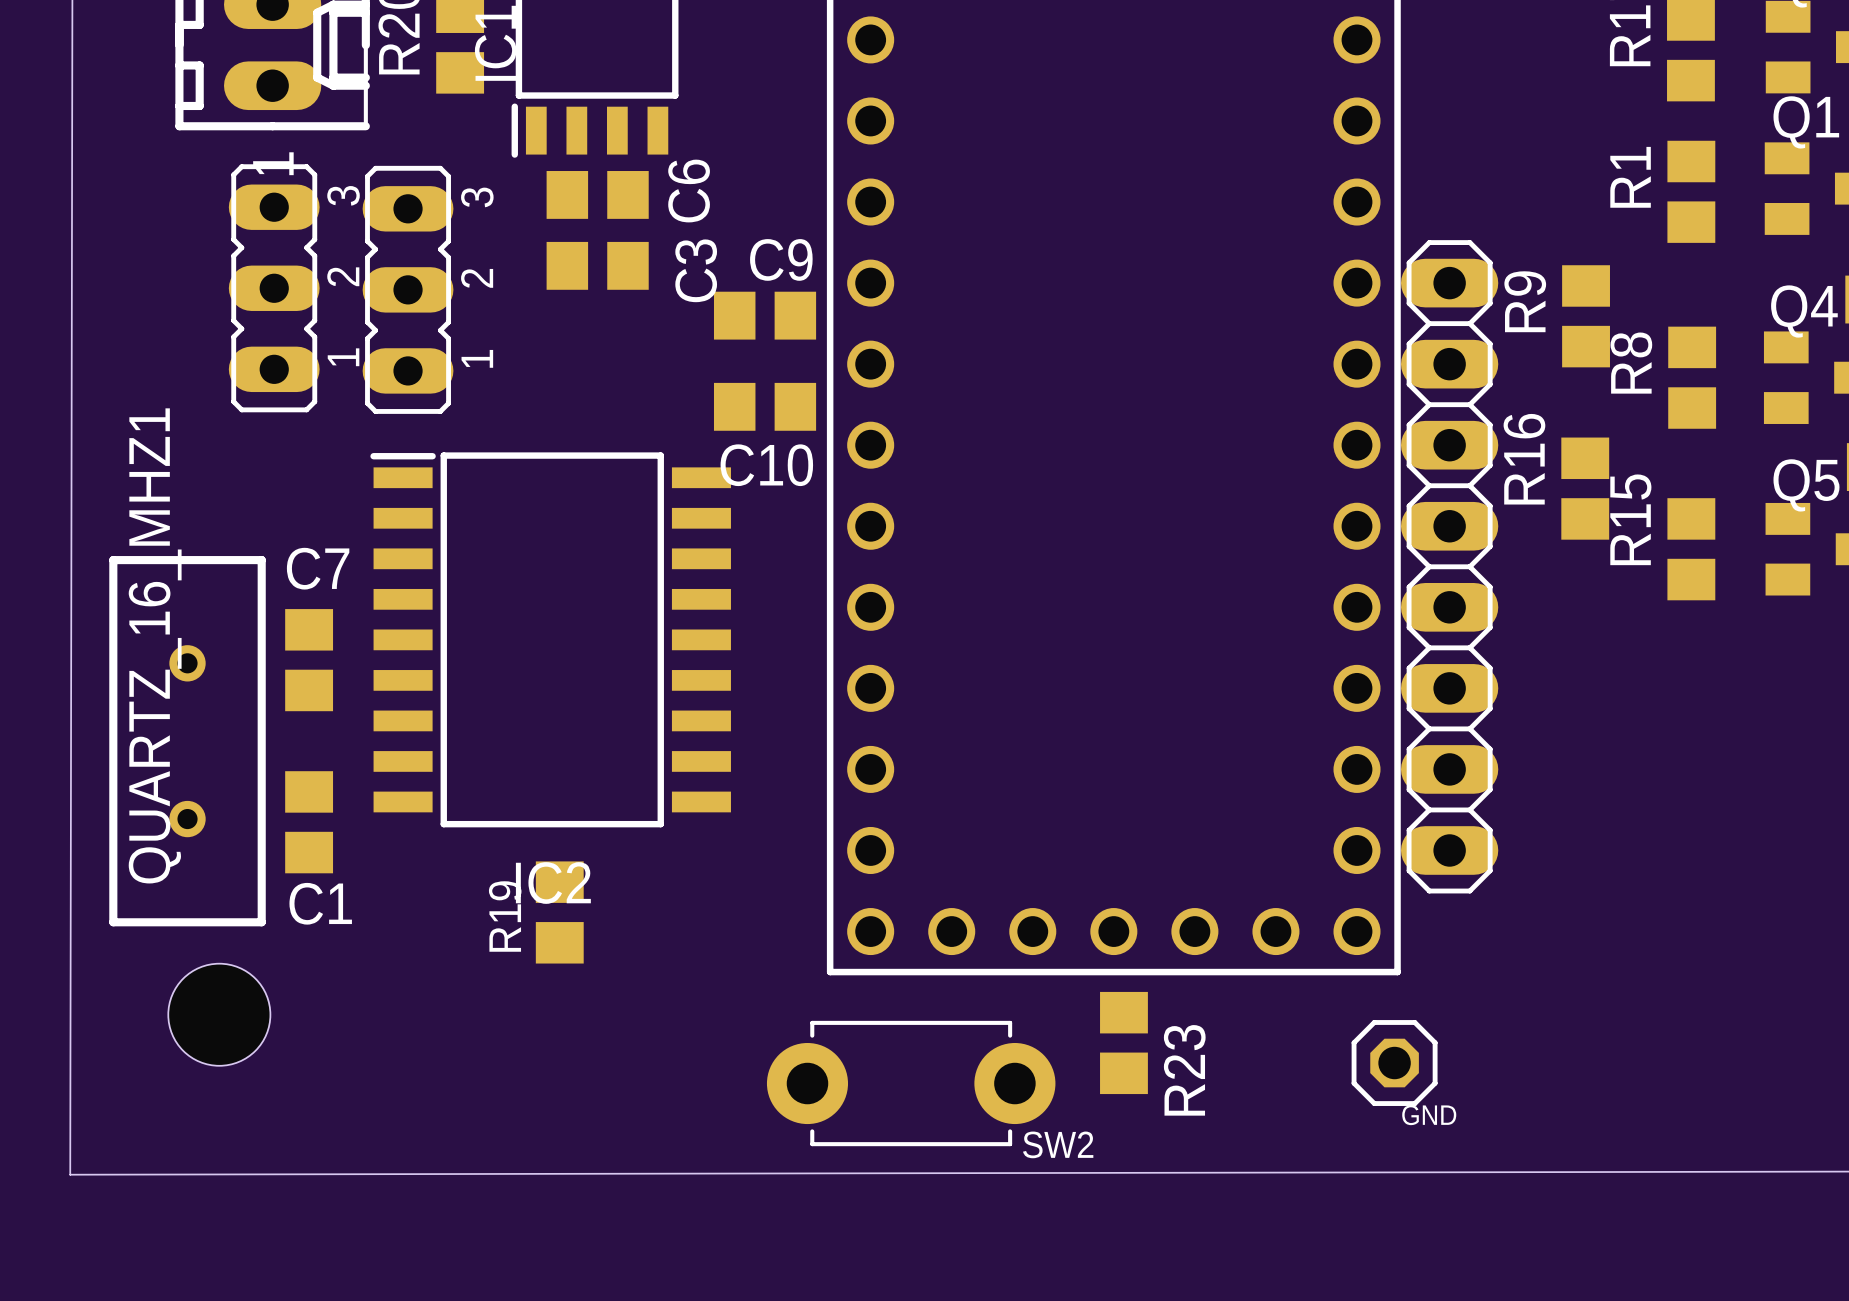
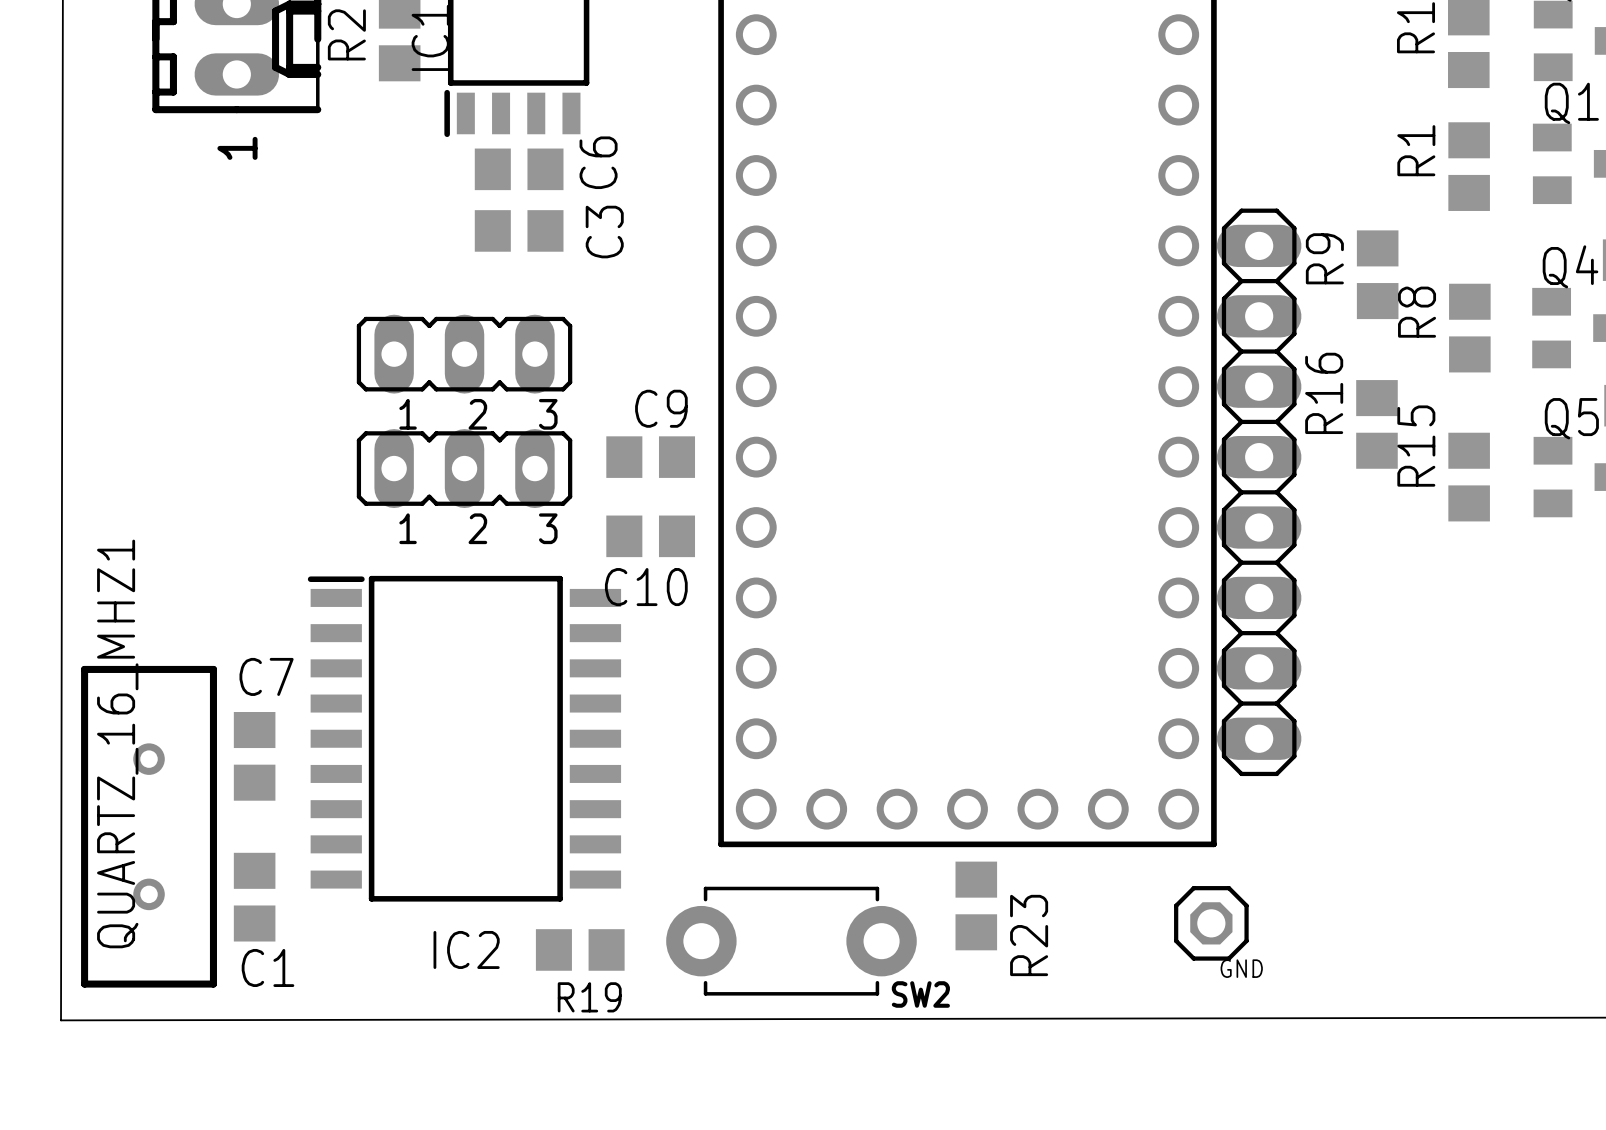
part: (274, 288) -> none
part: (408, 289) -> none
C9 position: (765, 315) -> (650, 457)
C10 position: (765, 406) -> (650, 536)
part: none -> (464, 354)
part: none -> (464, 468)
IC2 position: (550, 639) -> (464, 738)
C7 position: (309, 660) -> (254, 756)
QUARTZ_16_MHZ1 position: (187, 741) -> (149, 826)
C1 position: (309, 822) -> (254, 897)
R19 rotation: 0° (559, 912) -> 90° clockwise (580, 949)
R19 position: (559, 912) -> (580, 949)
R19 name position: R19 (505, 916) -> R19 (589, 997)
hole: (219, 1014) -> none

